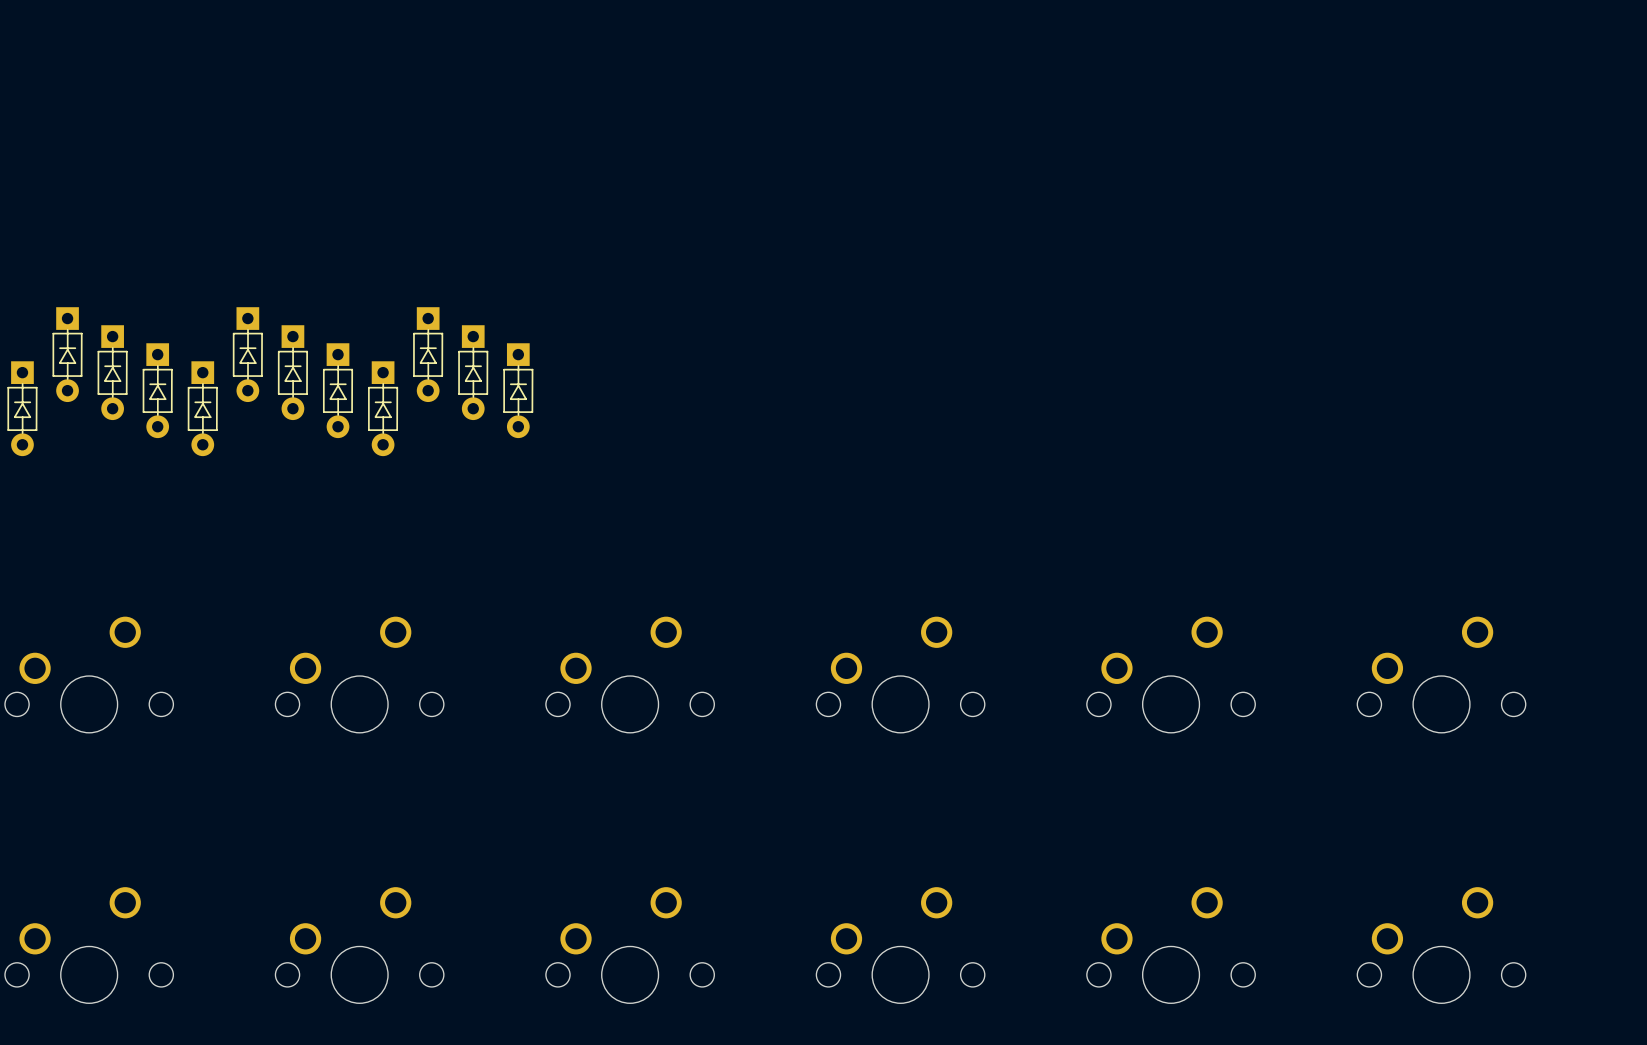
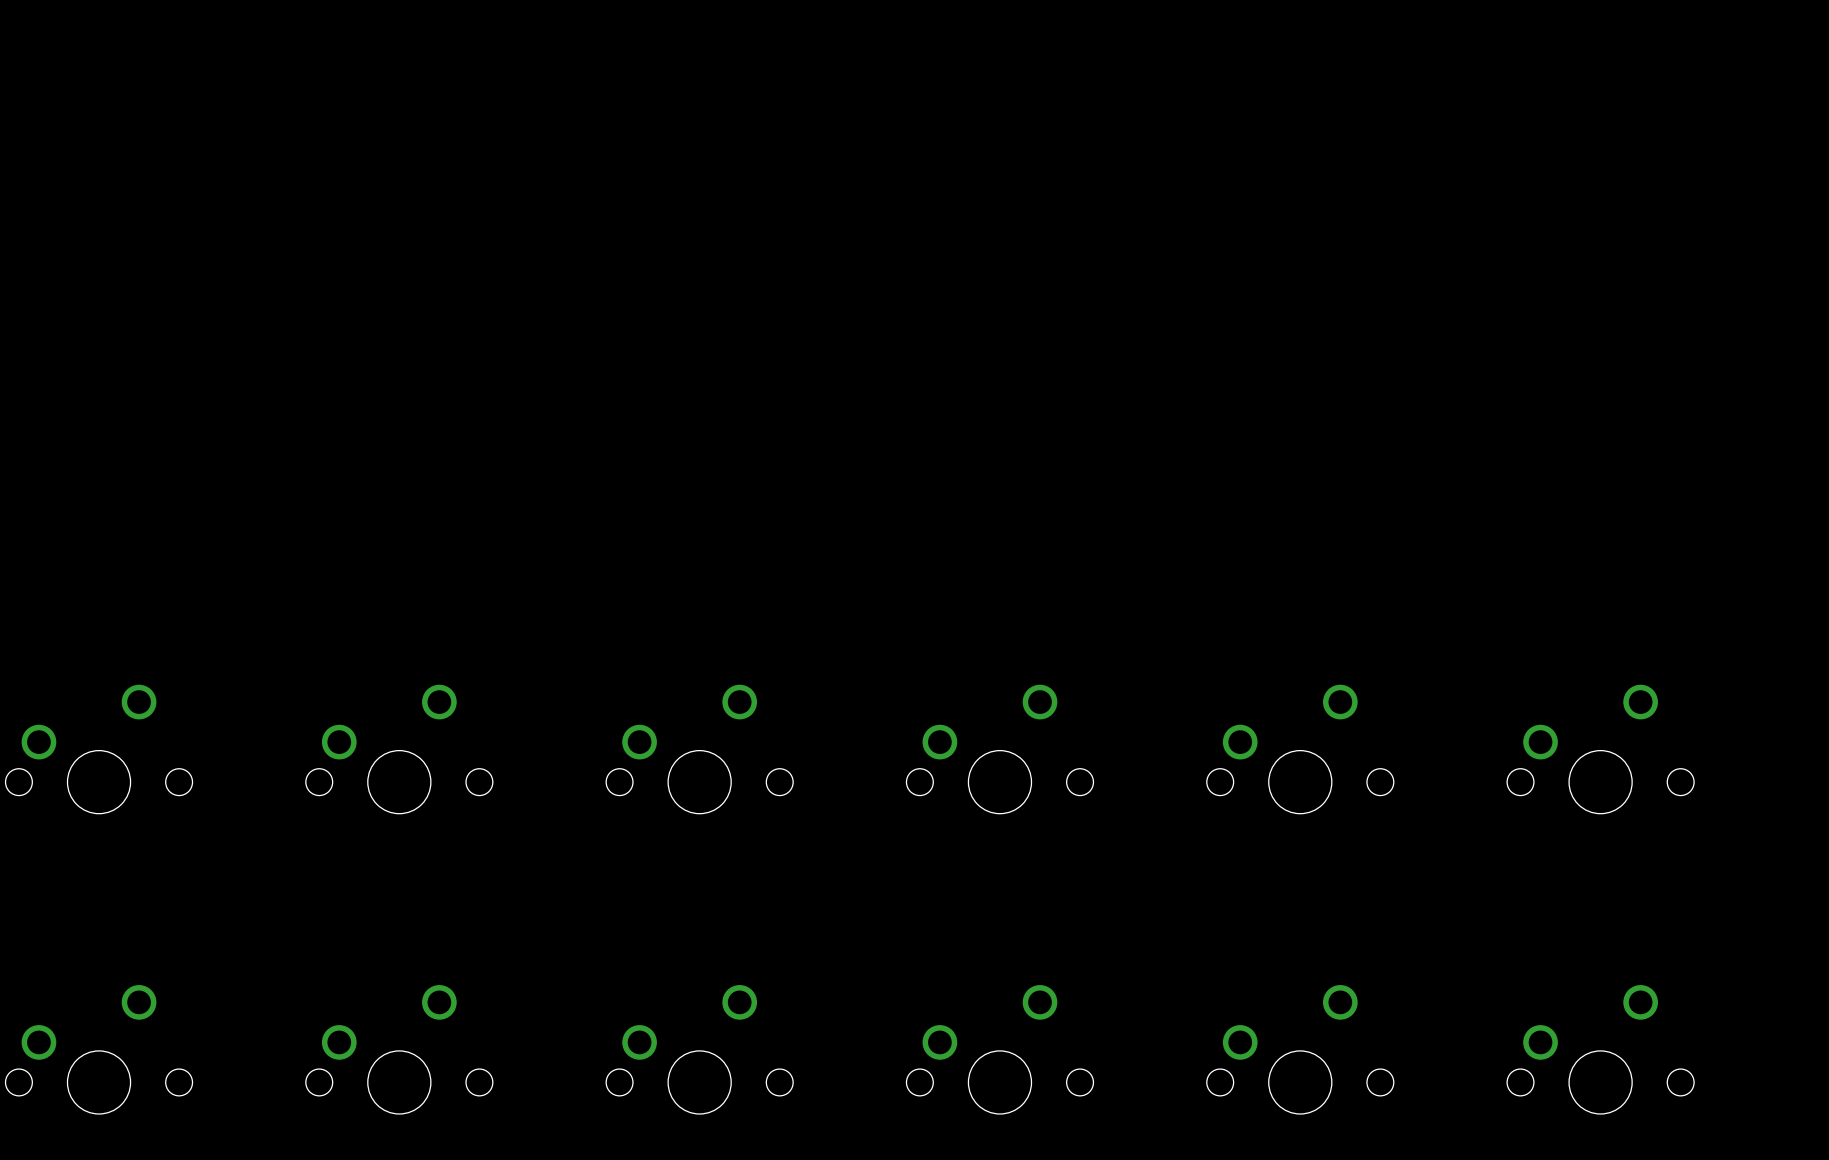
part: (67, 354) -> none
part: (247, 354) -> none
part: (428, 354) -> none
part: (112, 372) -> none
part: (292, 372) -> none
part: (473, 372) -> none
part: (157, 390) -> none
part: (338, 390) -> none
part: (518, 390) -> none
part: (22, 408) -> none
part: (202, 408) -> none
part: (383, 408) -> none

